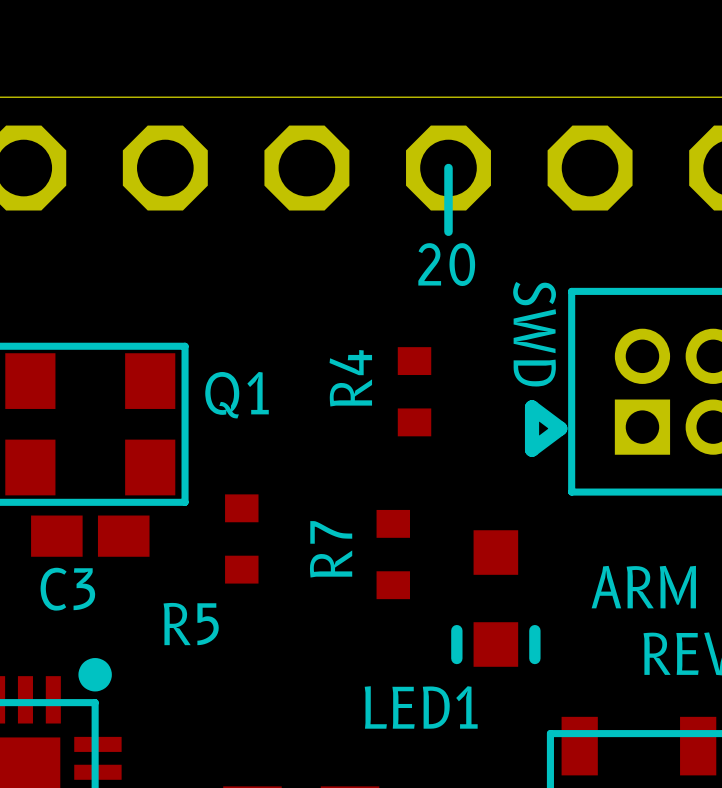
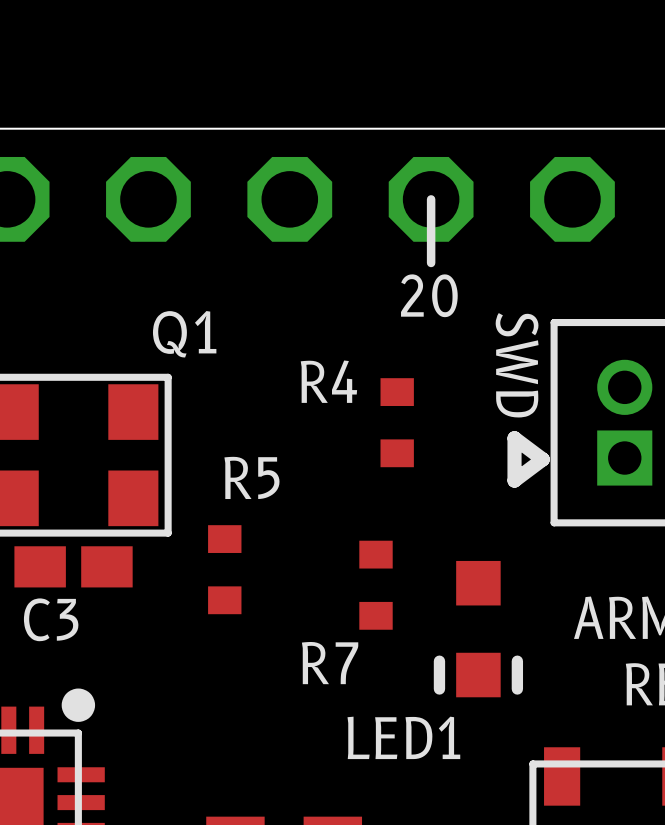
R4 name rotation: 0° (350, 378) -> 90° clockwise (328, 381)
Q1 name position: Q1 (237, 395) -> Q1 (184, 334)
R7 name rotation: 0° (331, 549) -> 90° clockwise (330, 663)
R7 name position: R7 (331, 549) -> R7 (330, 663)
R5 name position: R5 (191, 624) -> R5 (251, 477)

